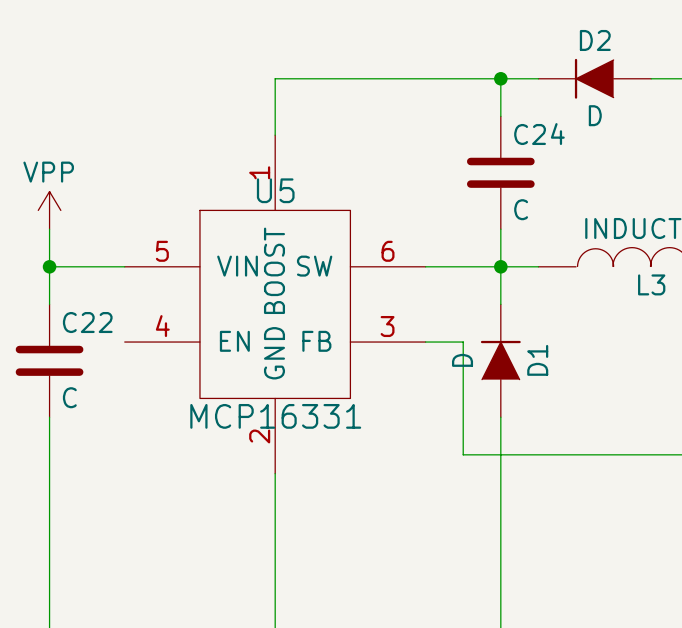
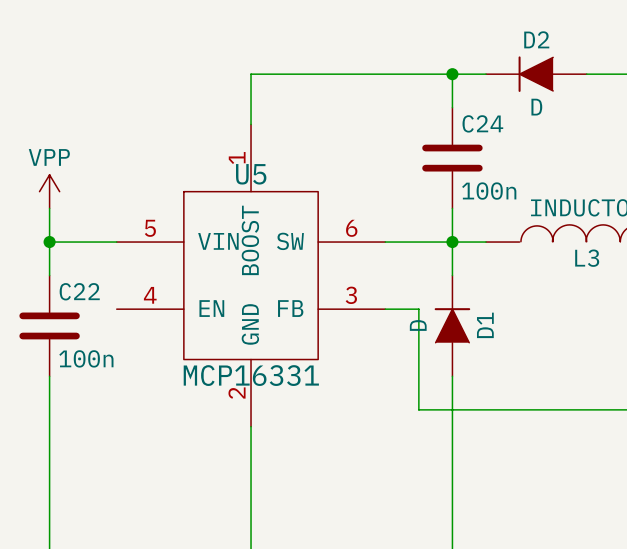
C24 value: C (521, 209) -> 100n (489, 191)
C22 value: C (69, 397) -> 100n (86, 358)

